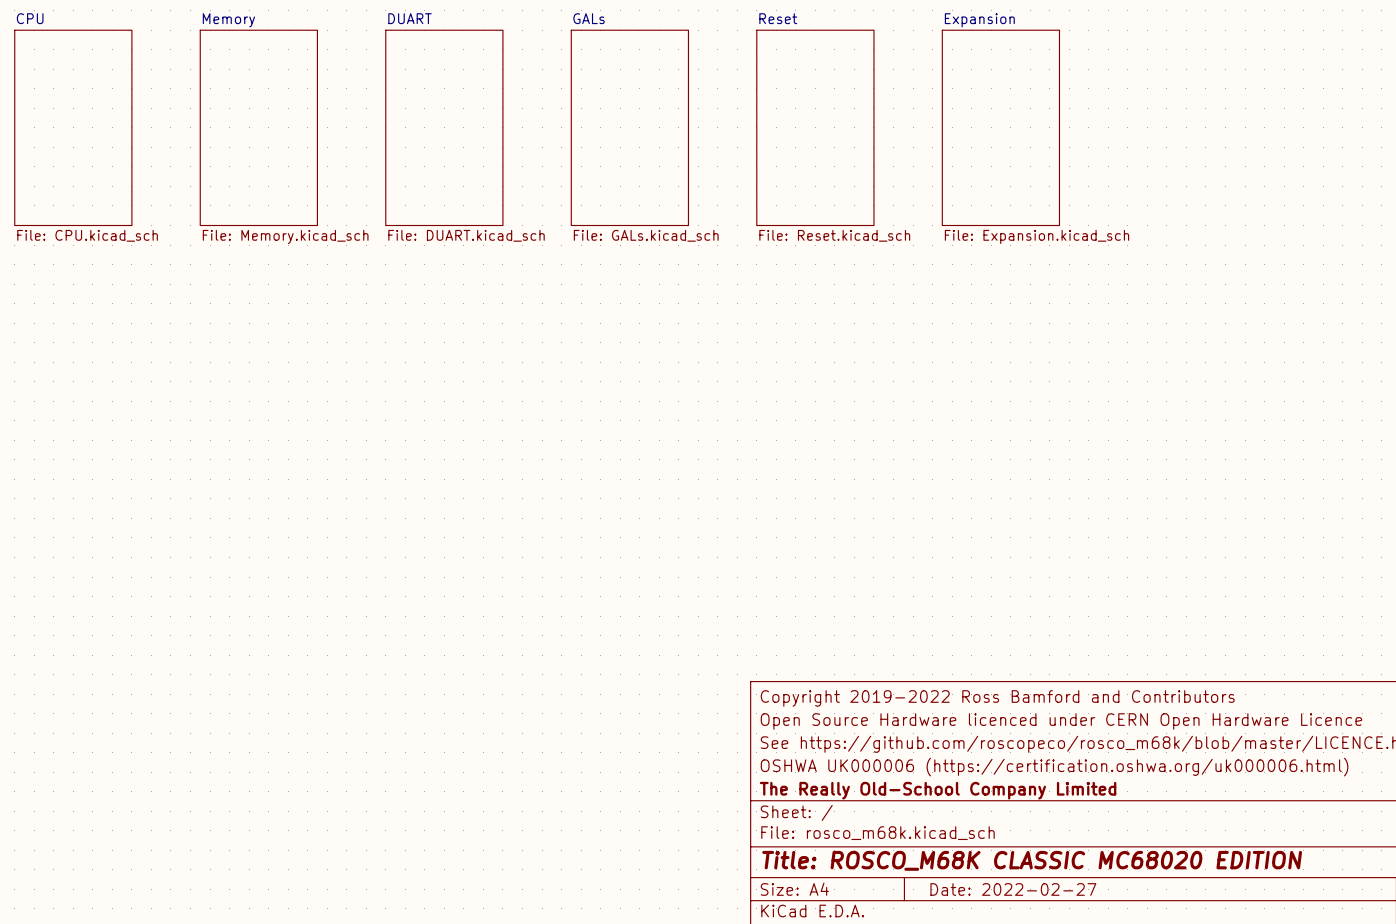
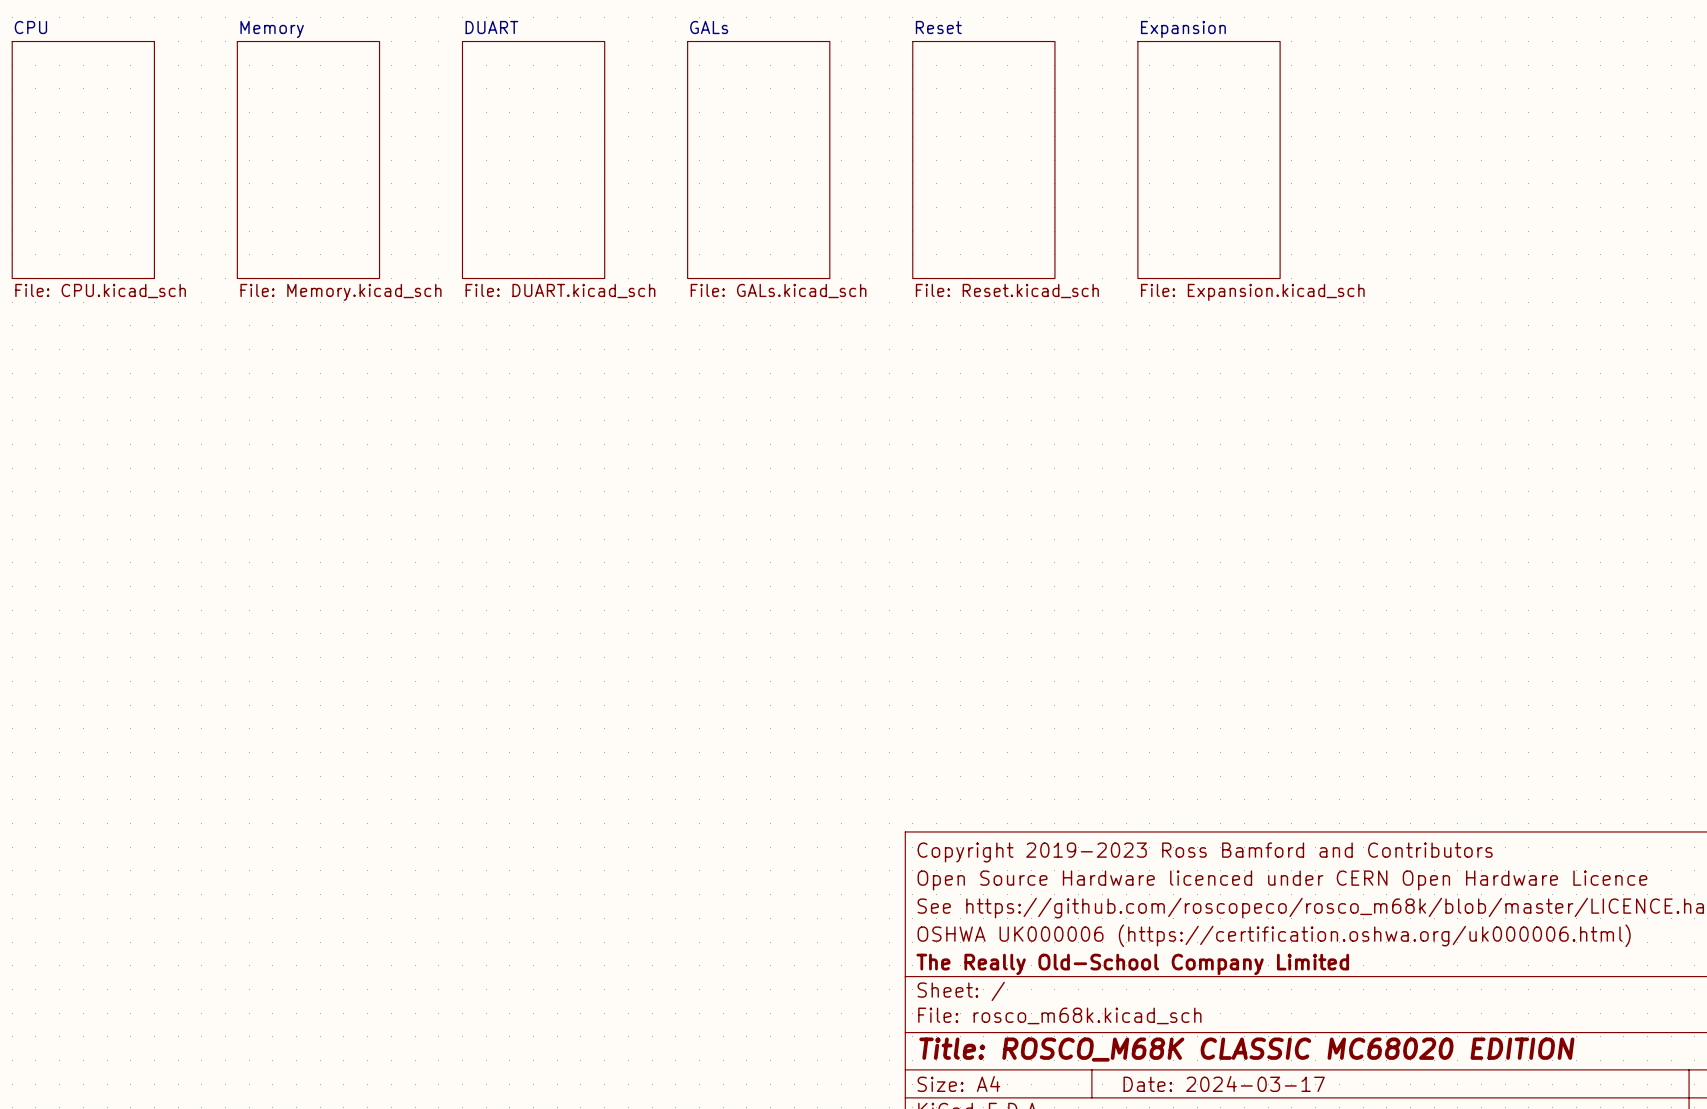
title block: Copyright 2019-2022 Ross Bamford and Contributors (997, 698) -> Copyright 2019-2023 Ross Bamford and Contributors (1205, 852)
title block: Date: 2022-02-27 (1013, 889) -> Date: 2024-03-17 (1224, 1083)

